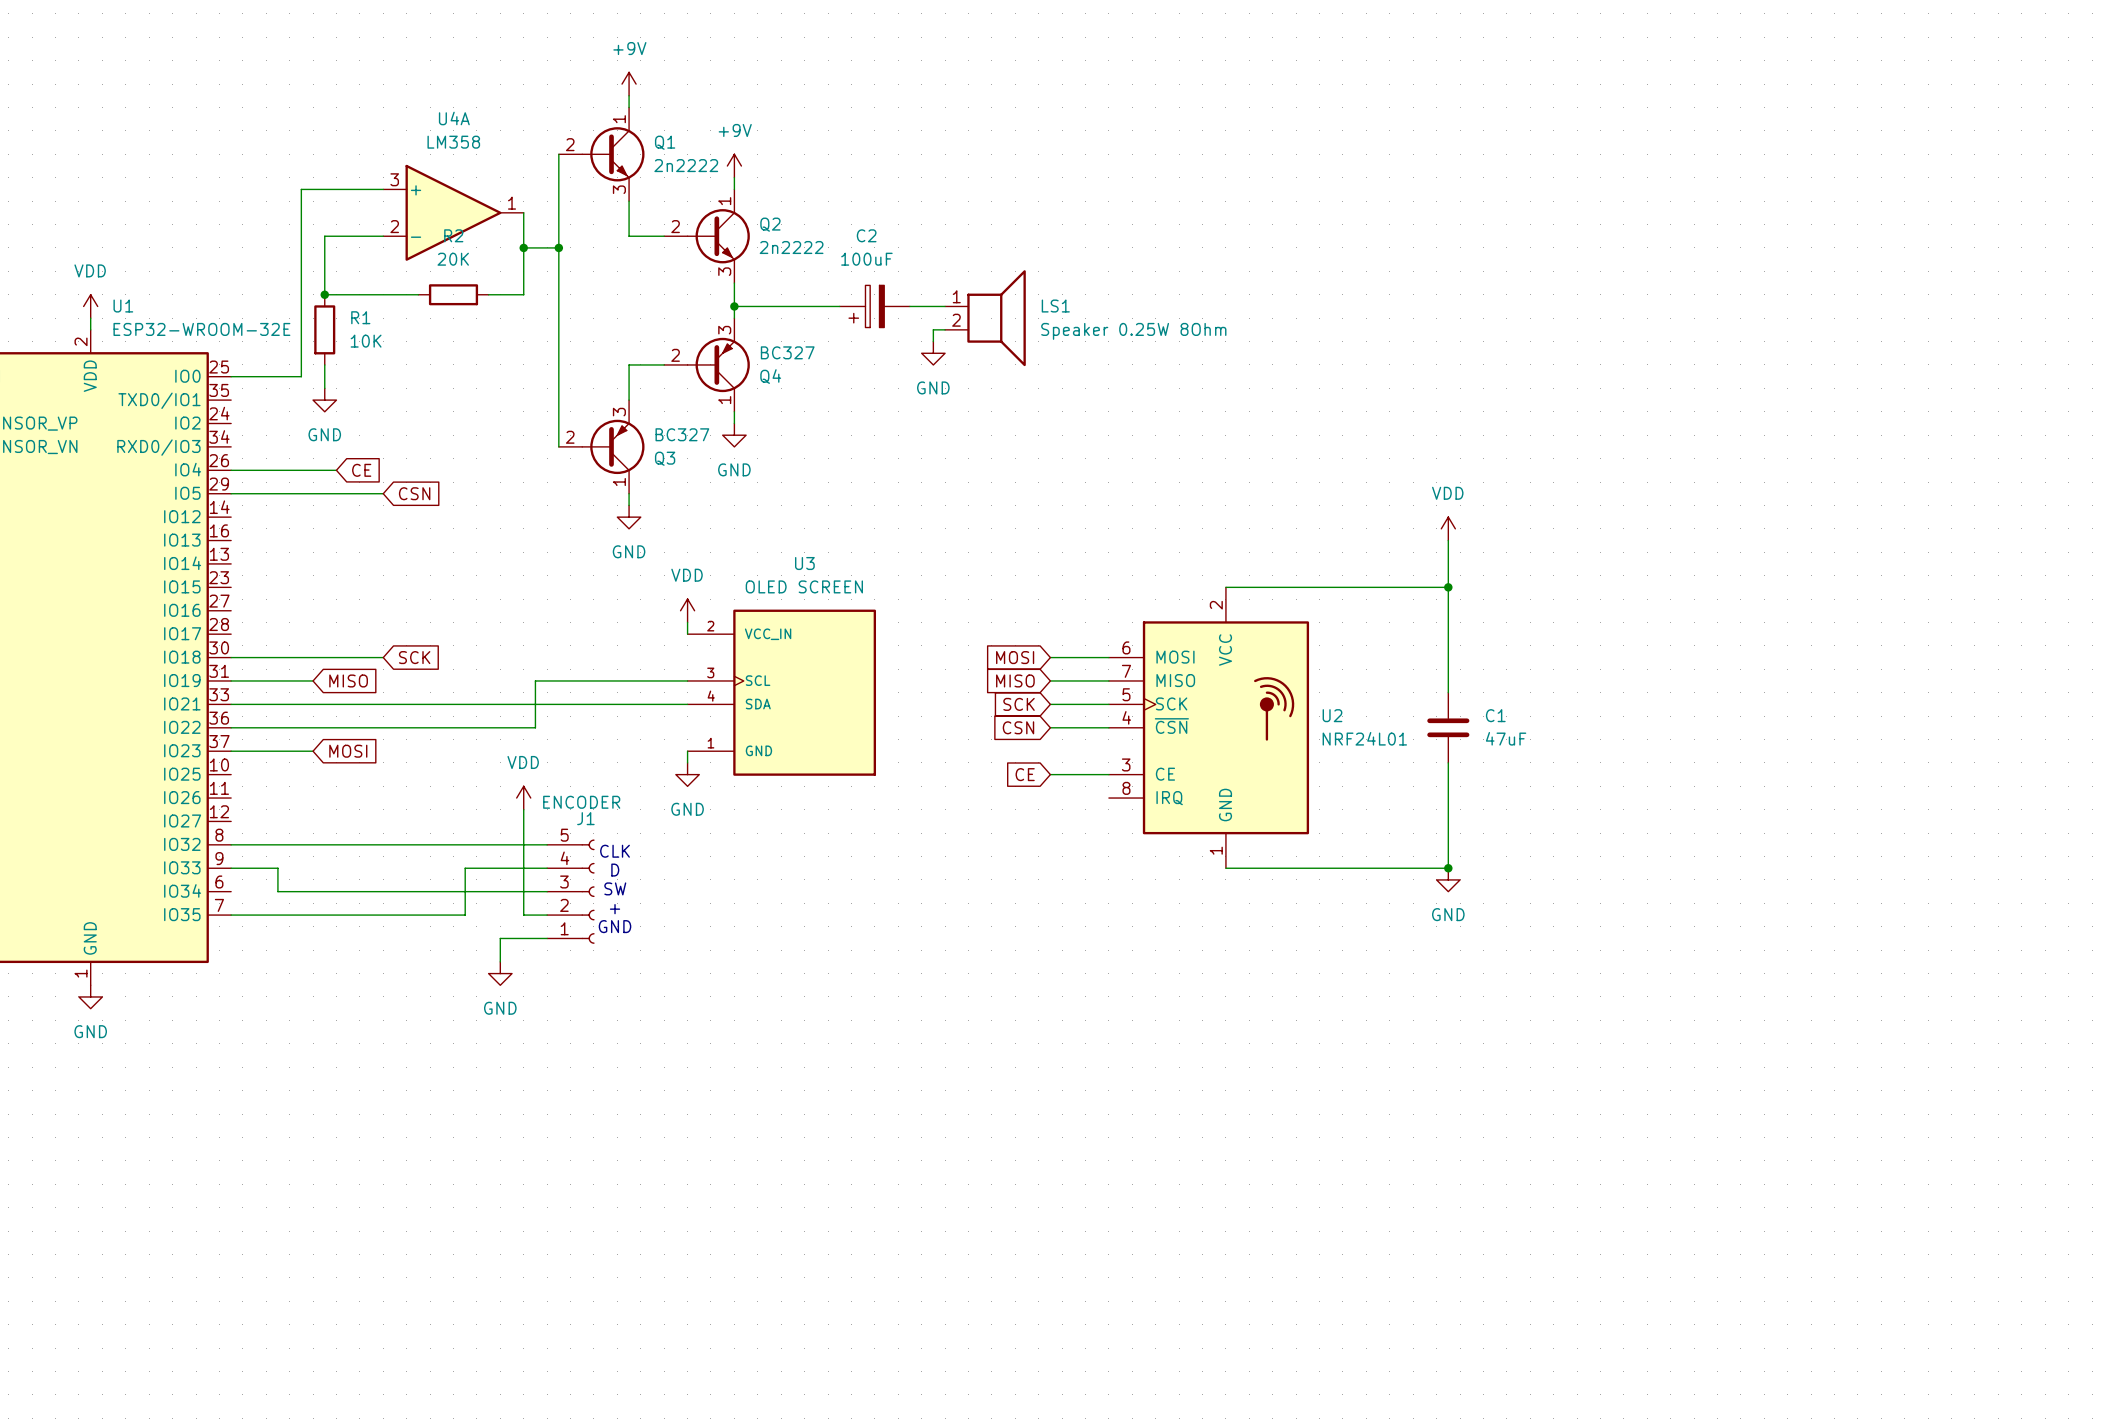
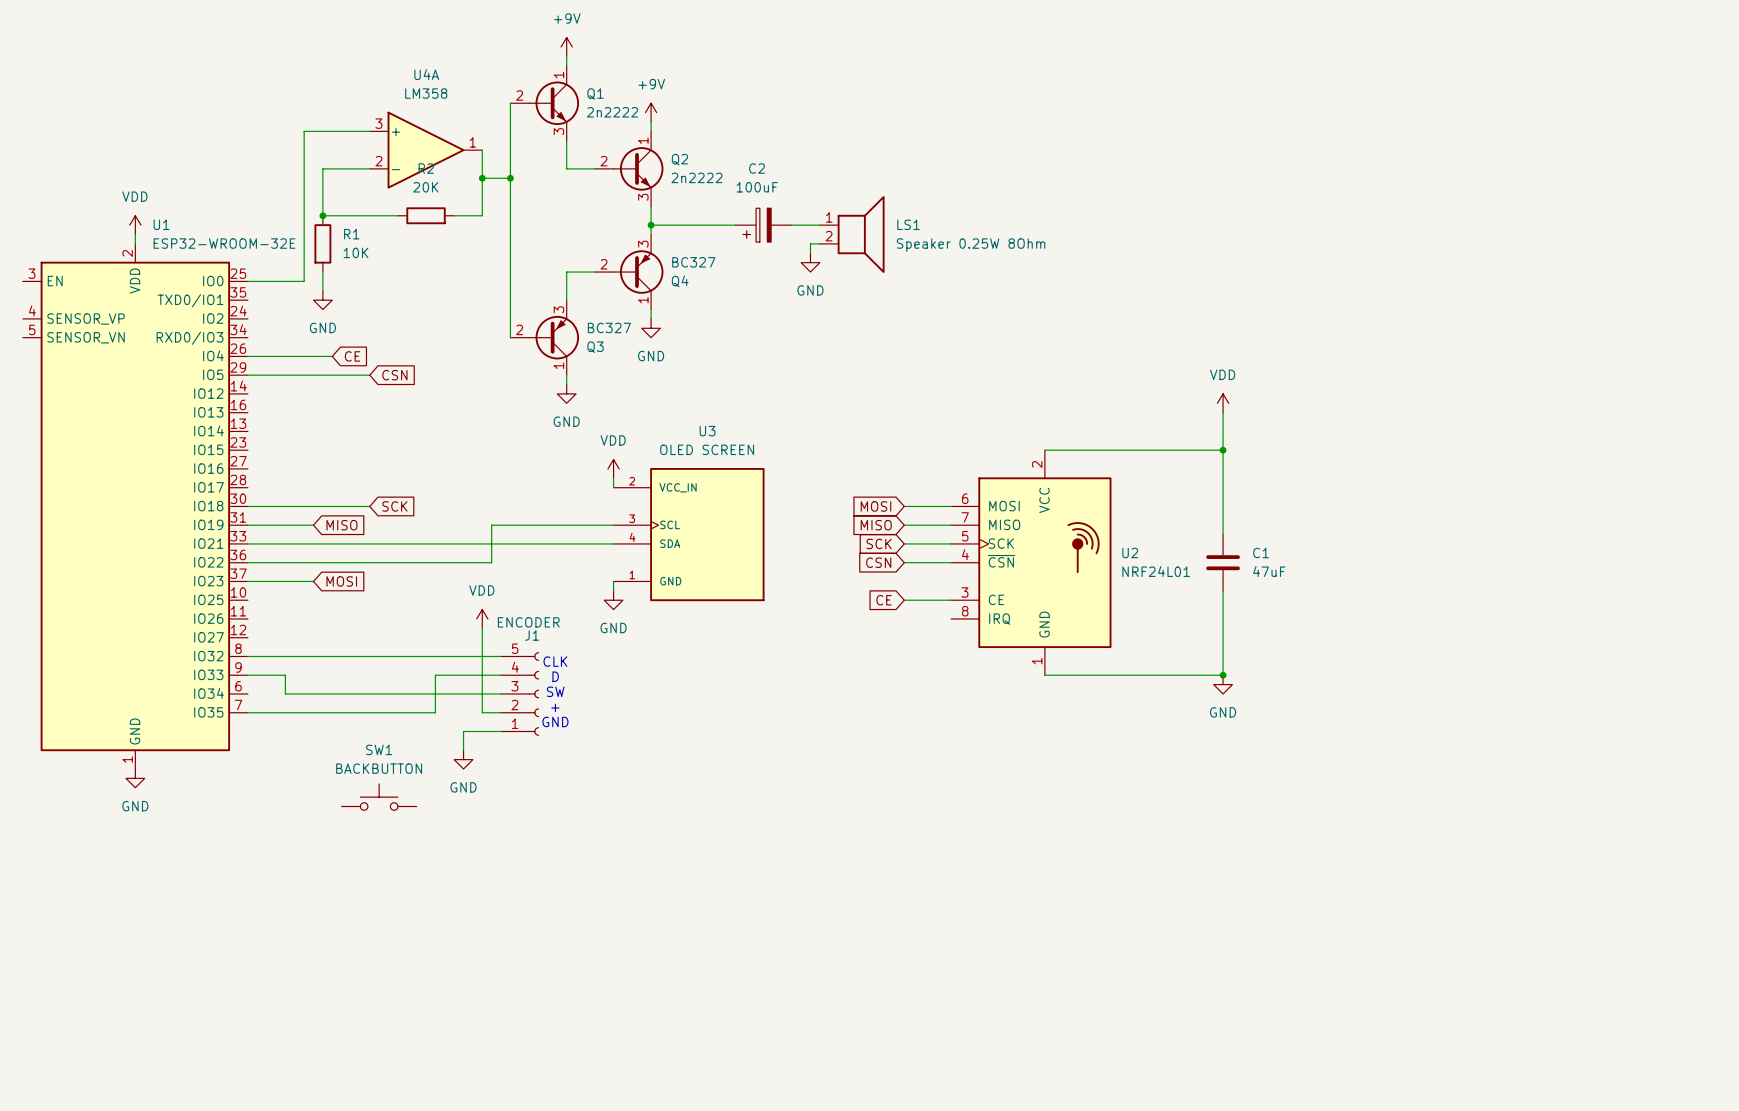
SW1: none -> BACKBUTTON (379, 797)

